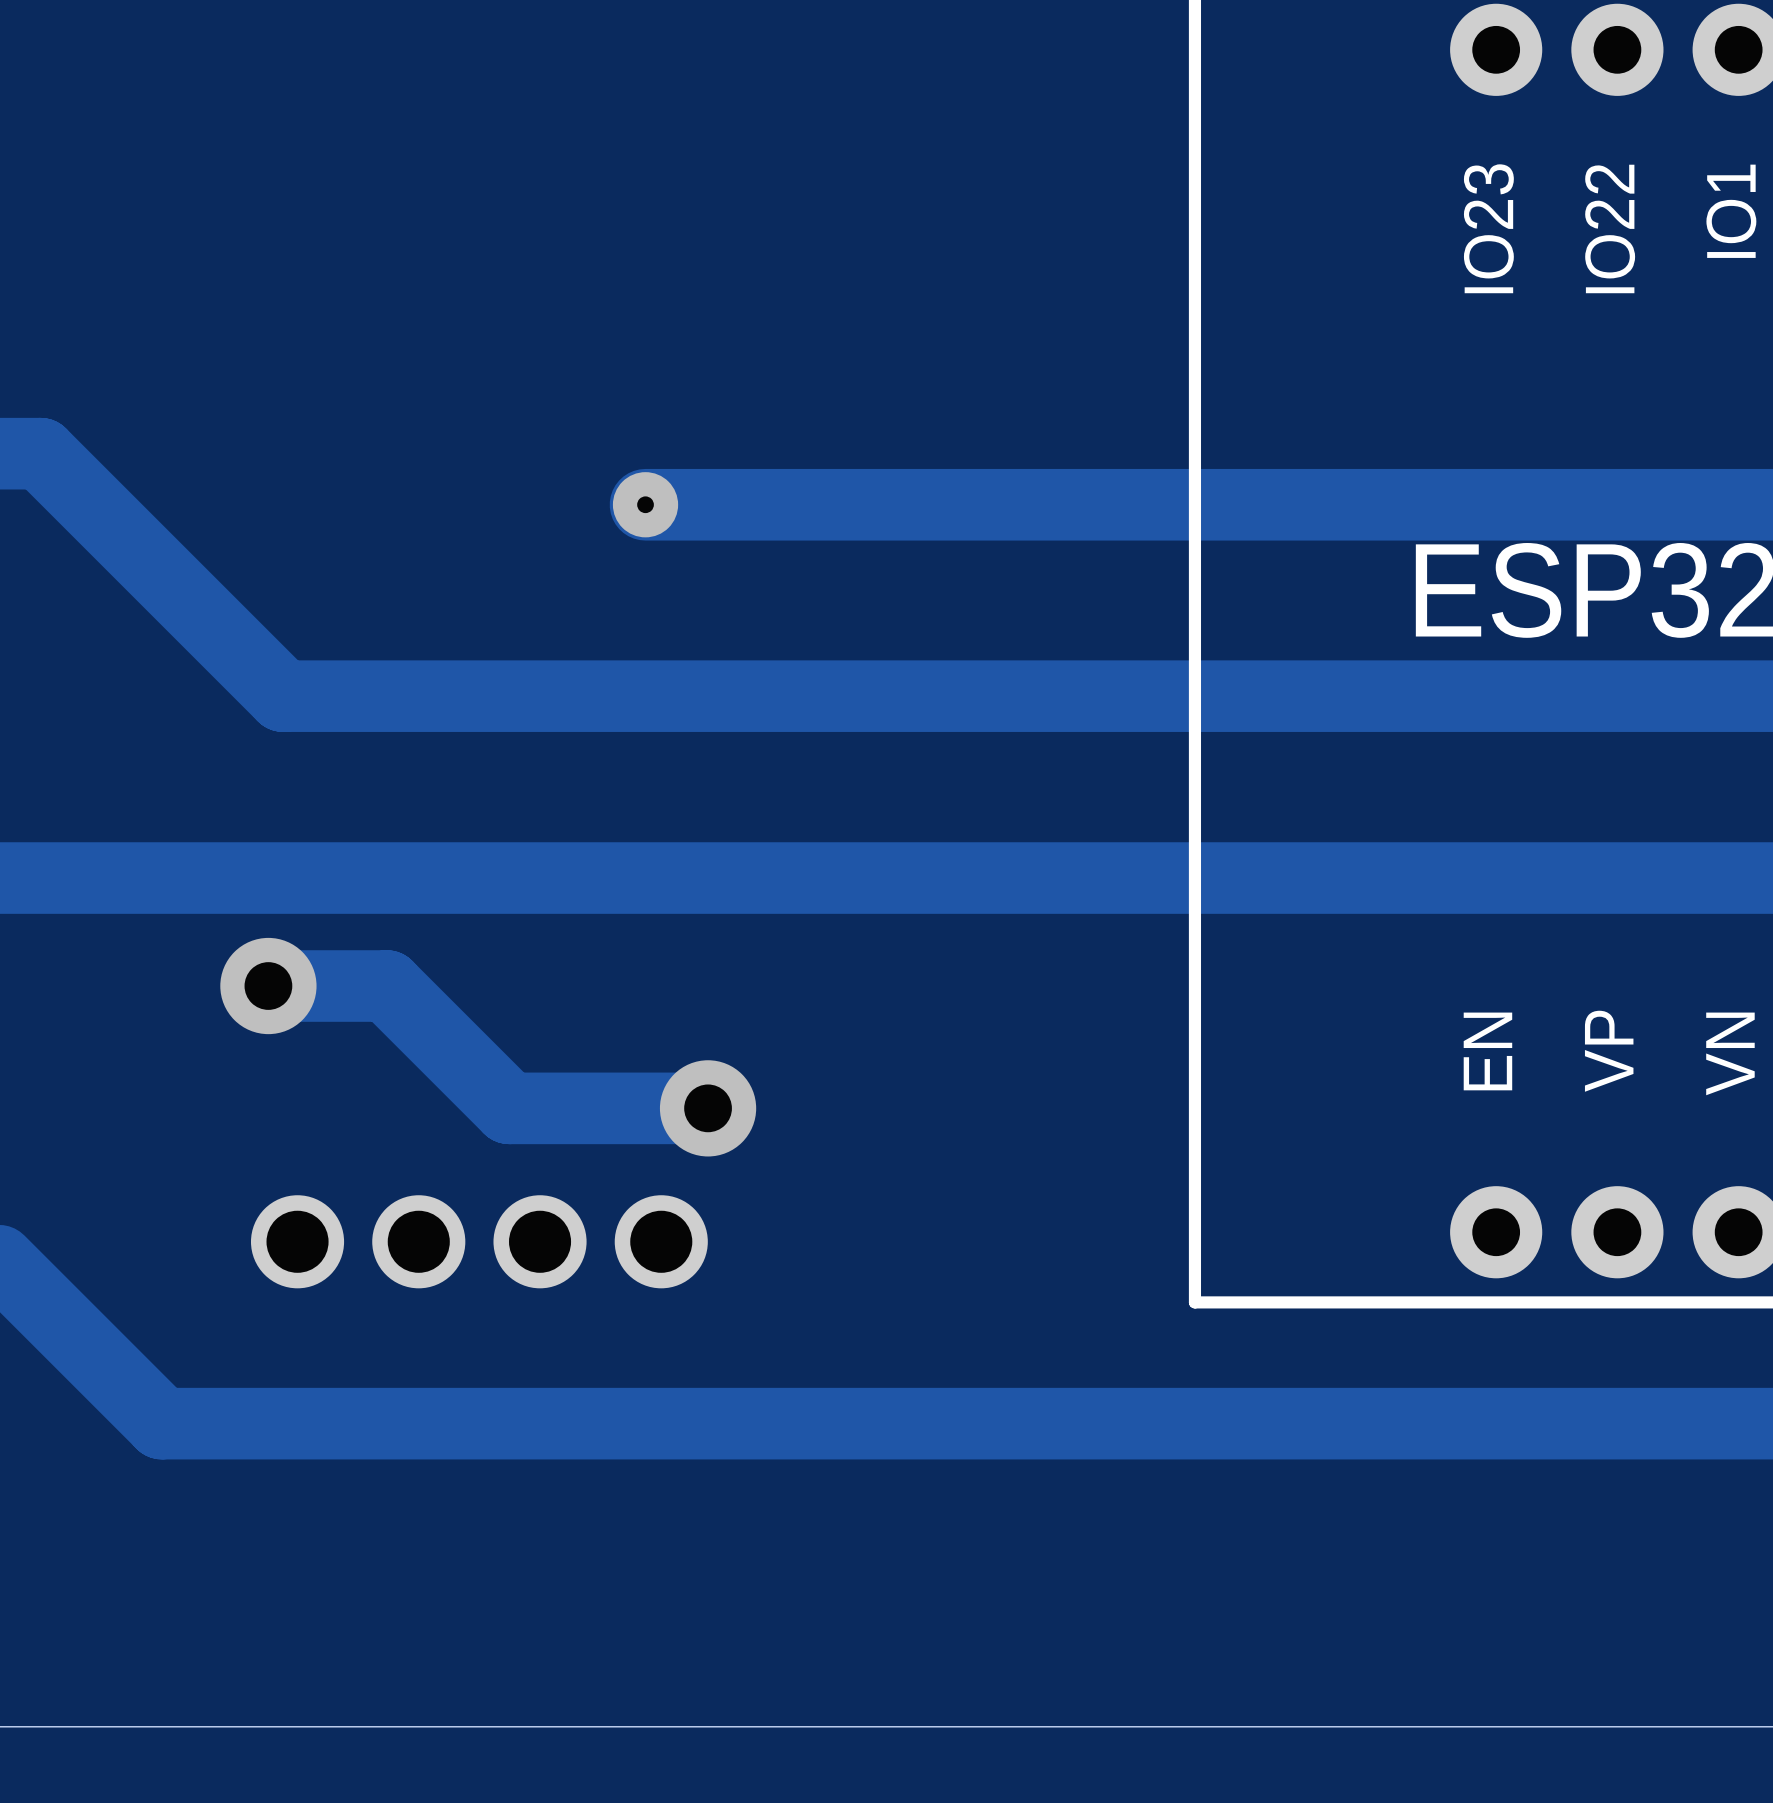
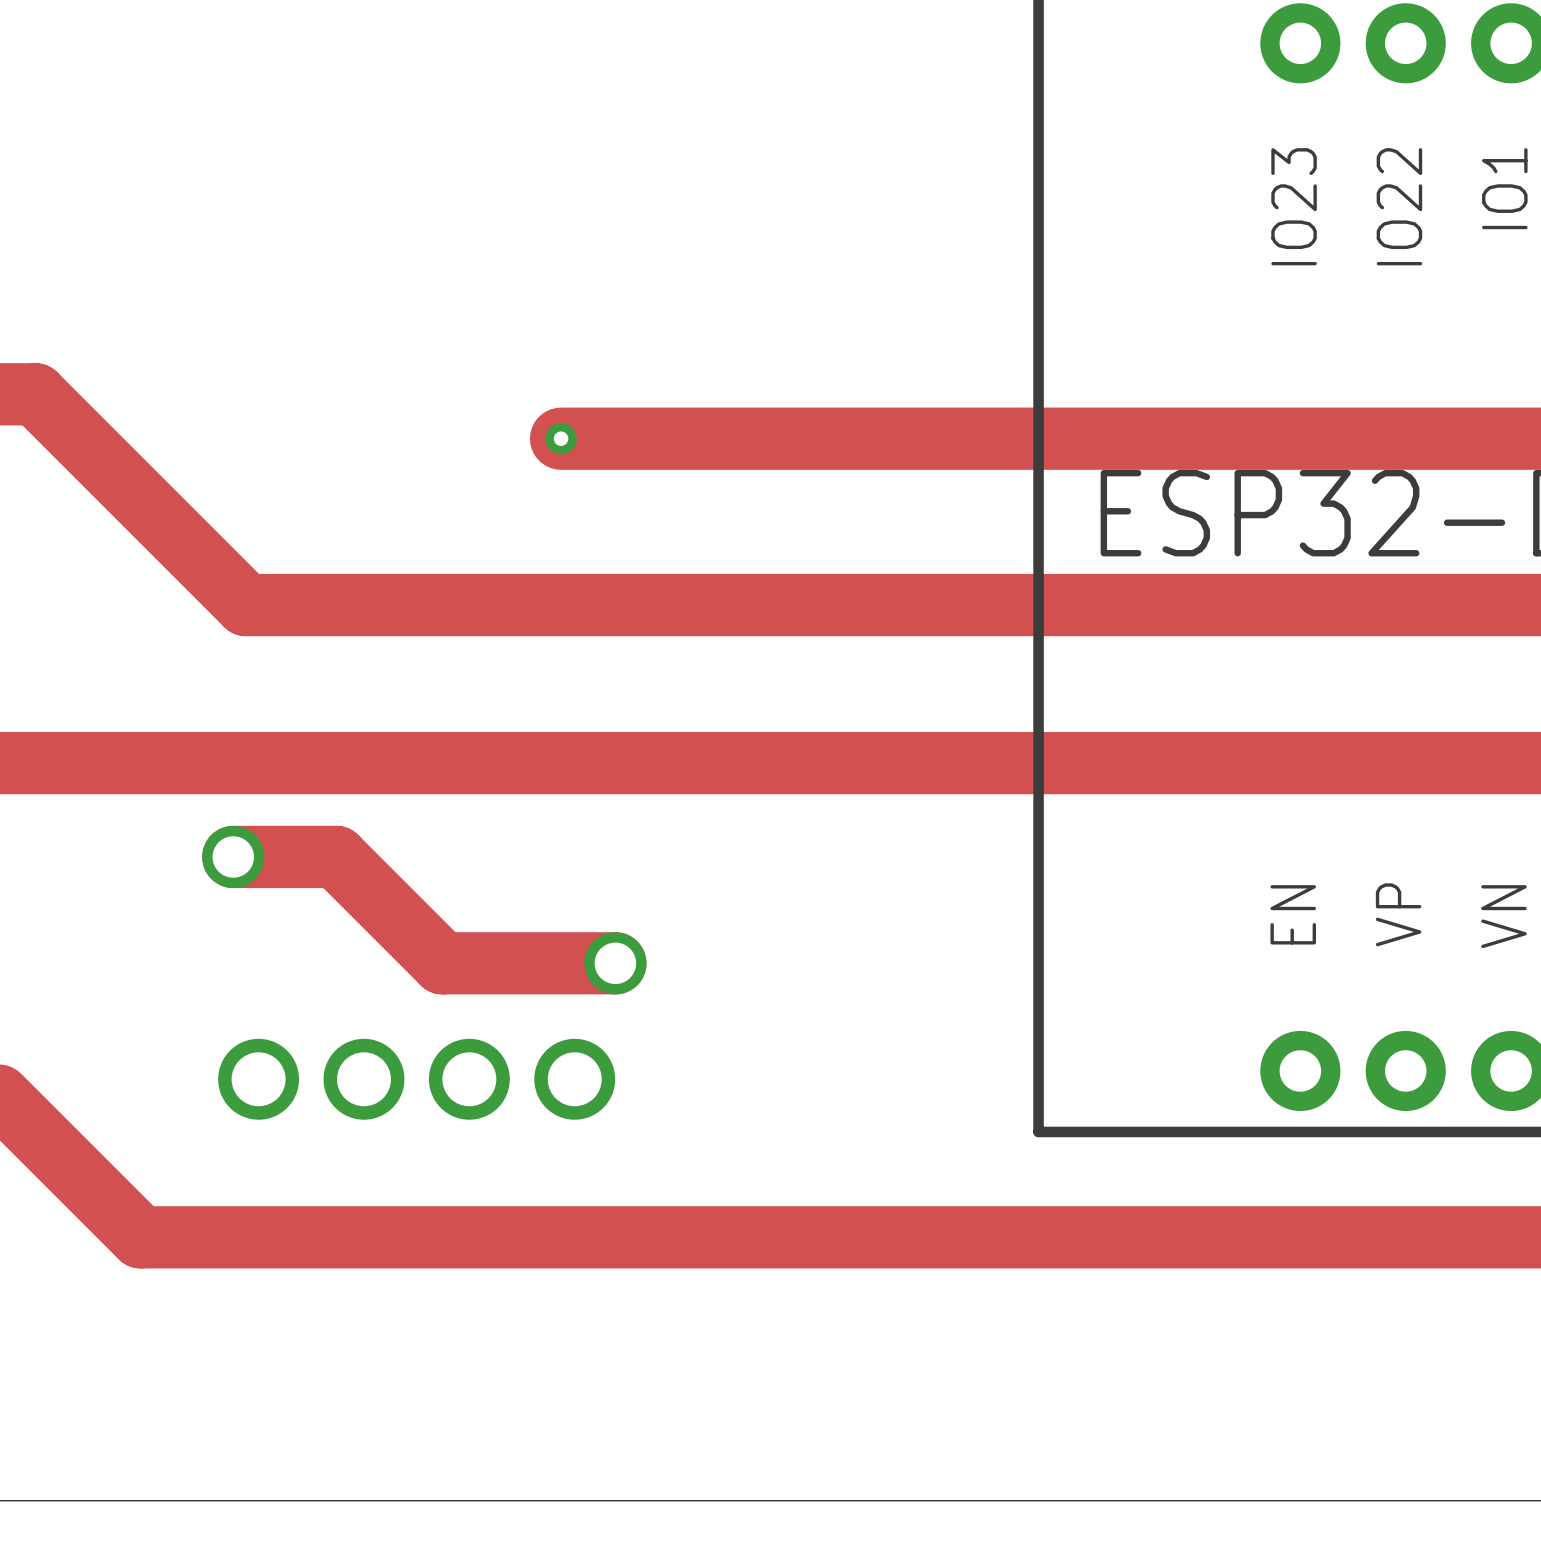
via size: [612, 472, 679, 538] -> [545, 423, 577, 455]
via size: [220, 937, 317, 1035] -> [202, 825, 265, 889]
via size: [659, 1060, 757, 1157] -> [584, 932, 647, 995]

